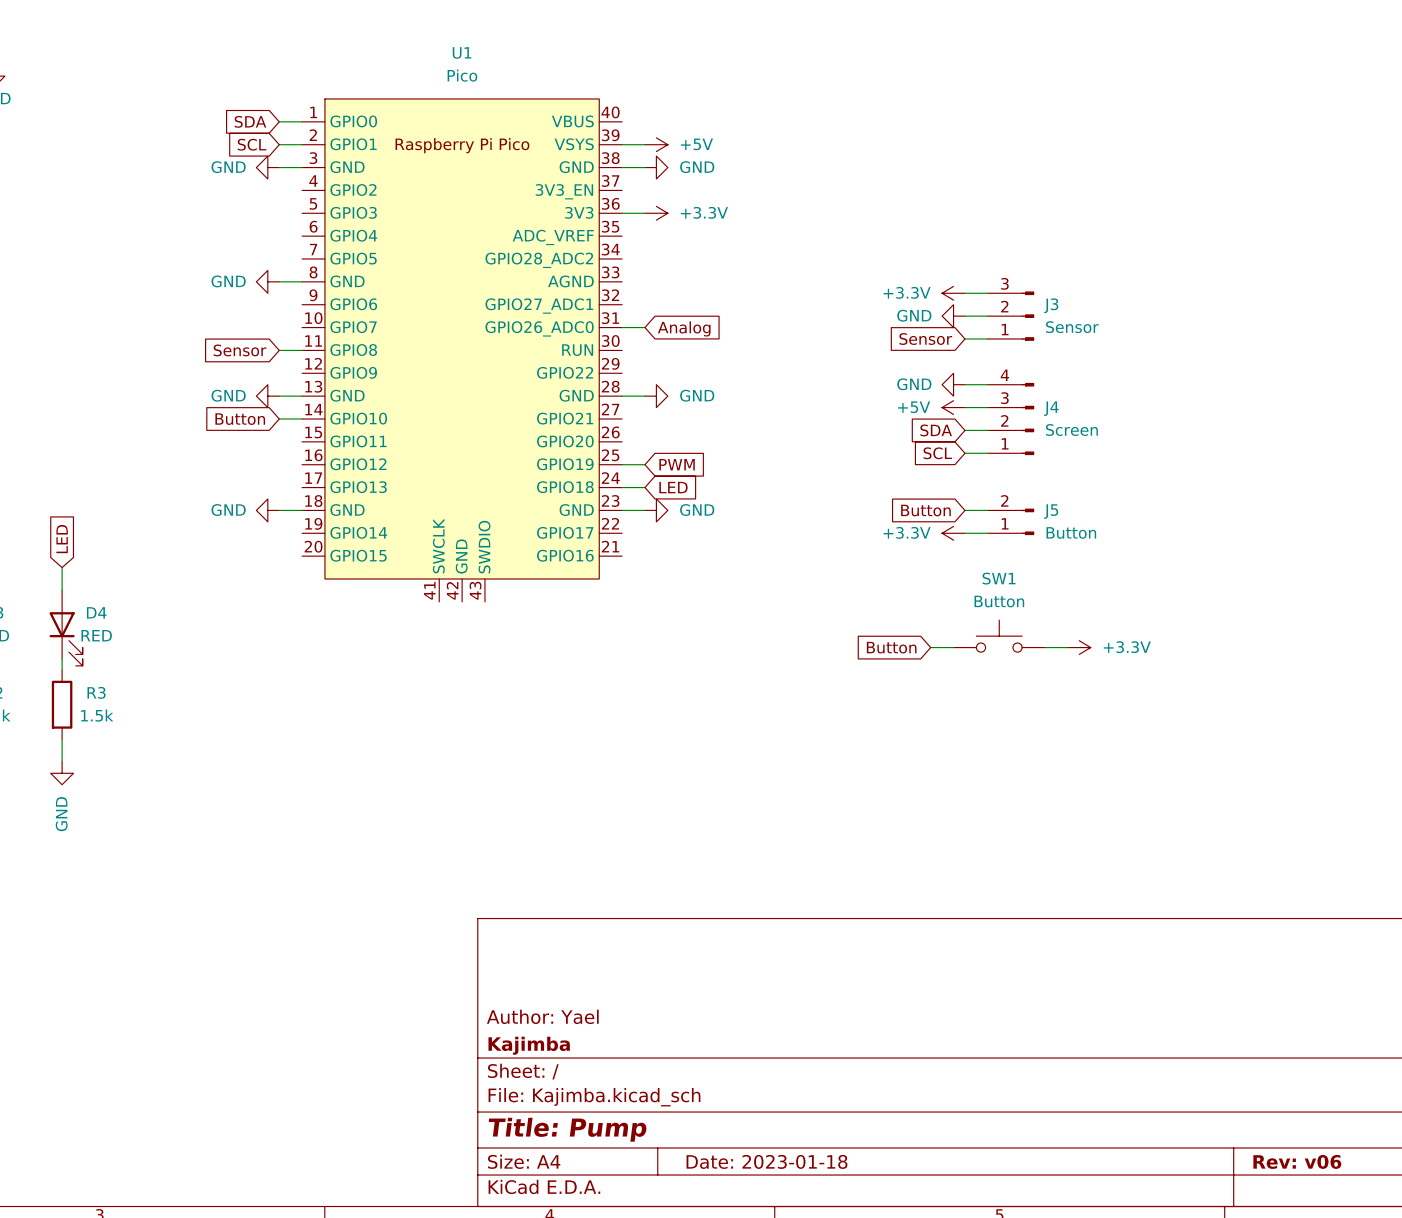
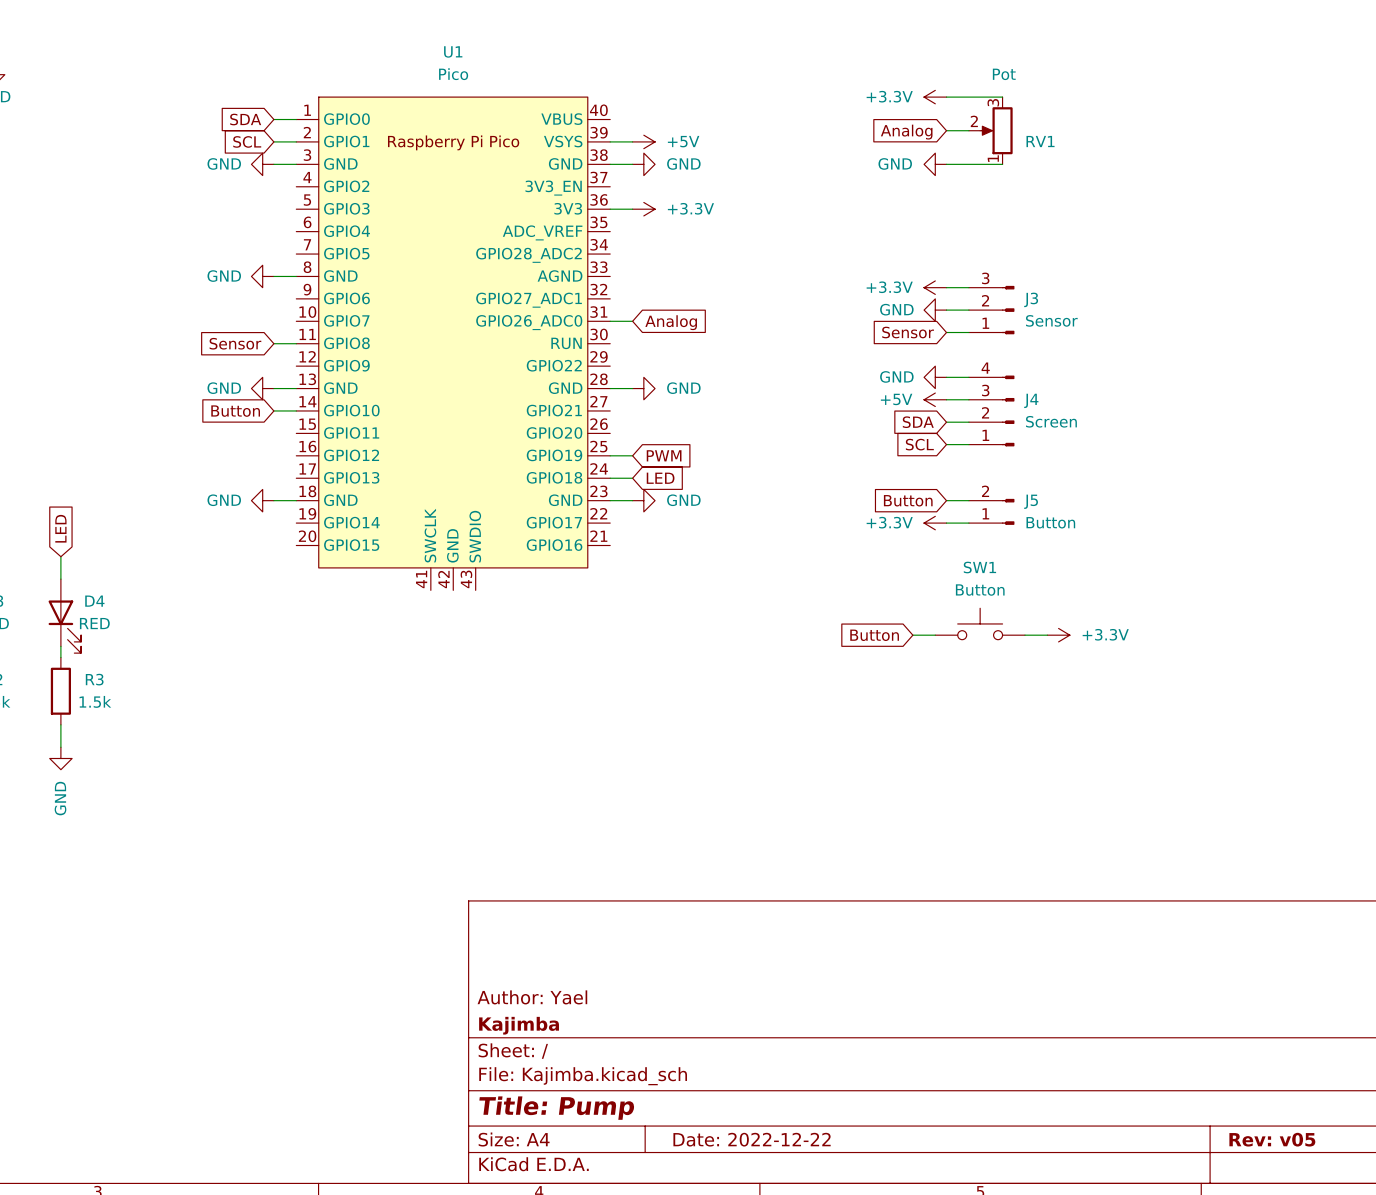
power symbol: none -> +3.3V (935, 97)
wire: none -> (946, 97) (1002, 97)
wire: none -> (946, 130) (968, 130)
RV1: none -> Pot (990, 130)
global label: none -> Analog (906, 132)
power symbol: none -> GND (935, 164)
wire: none -> (946, 164) (1002, 164)
title block: Date: 2023-01-18 (767, 1161) -> Date: 2022-12-22 (752, 1139)
title block: Rev: v06 (1297, 1161) -> Rev: v05 (1272, 1139)

